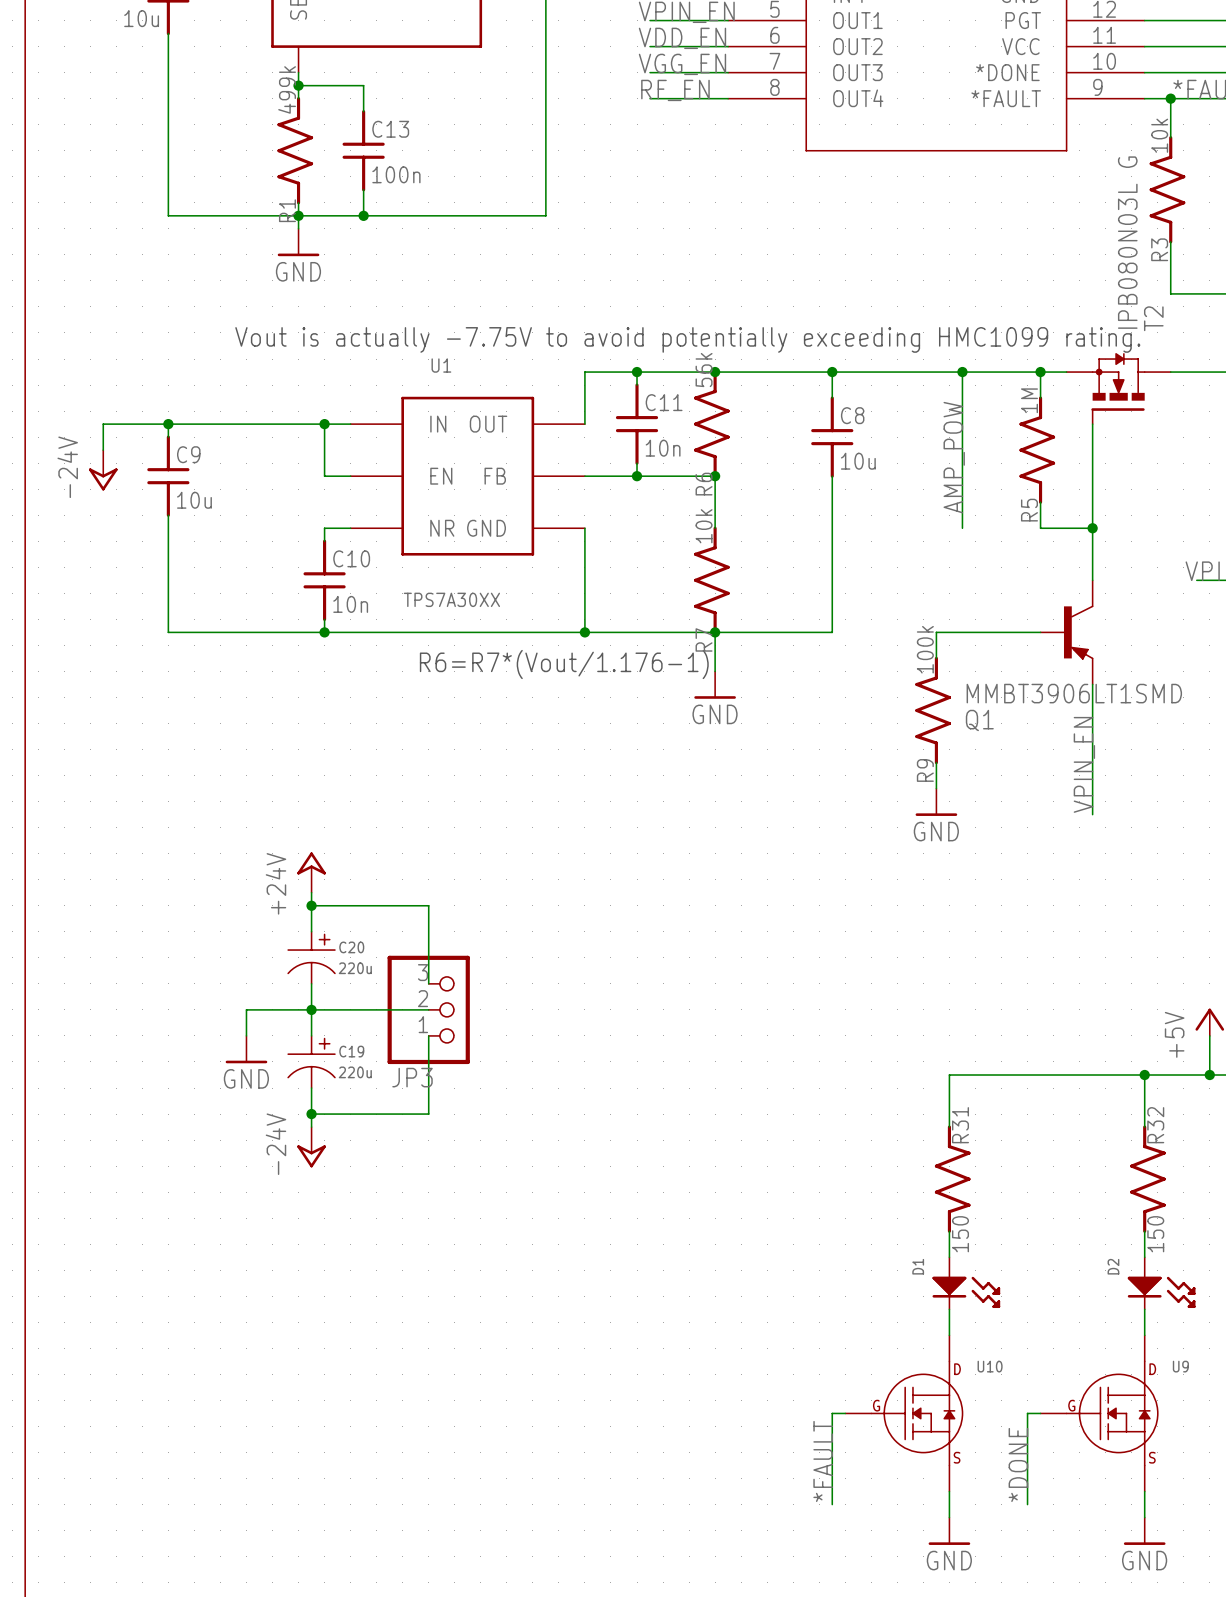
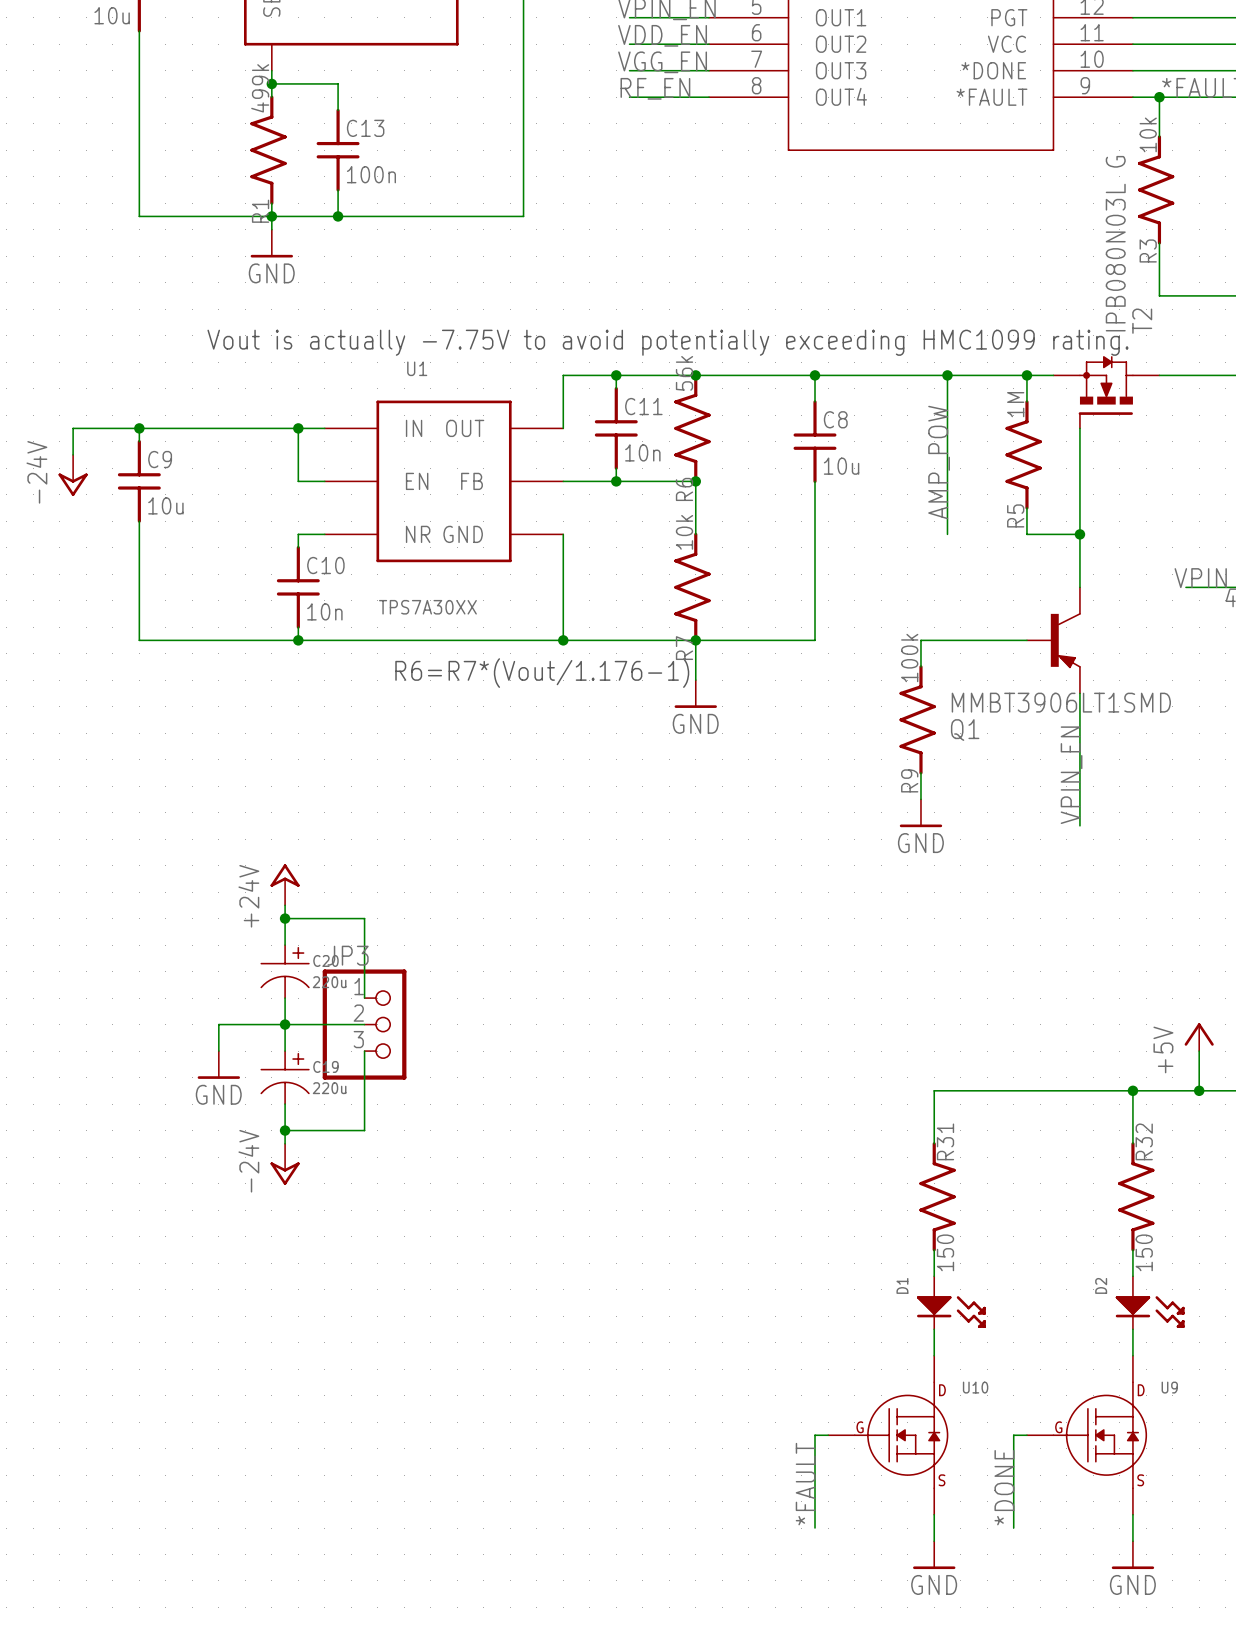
wire: (389, 905) (428, 905) (428, 983) -> (364, 918) (364, 998)
wire: (389, 1009) (428, 1009) -> none
JP3 flip: as is (428, 1009) -> up-down (364, 1024)
wire: (428, 1035) (428, 1114) (389, 1114) -> (364, 1051) (364, 1130)

